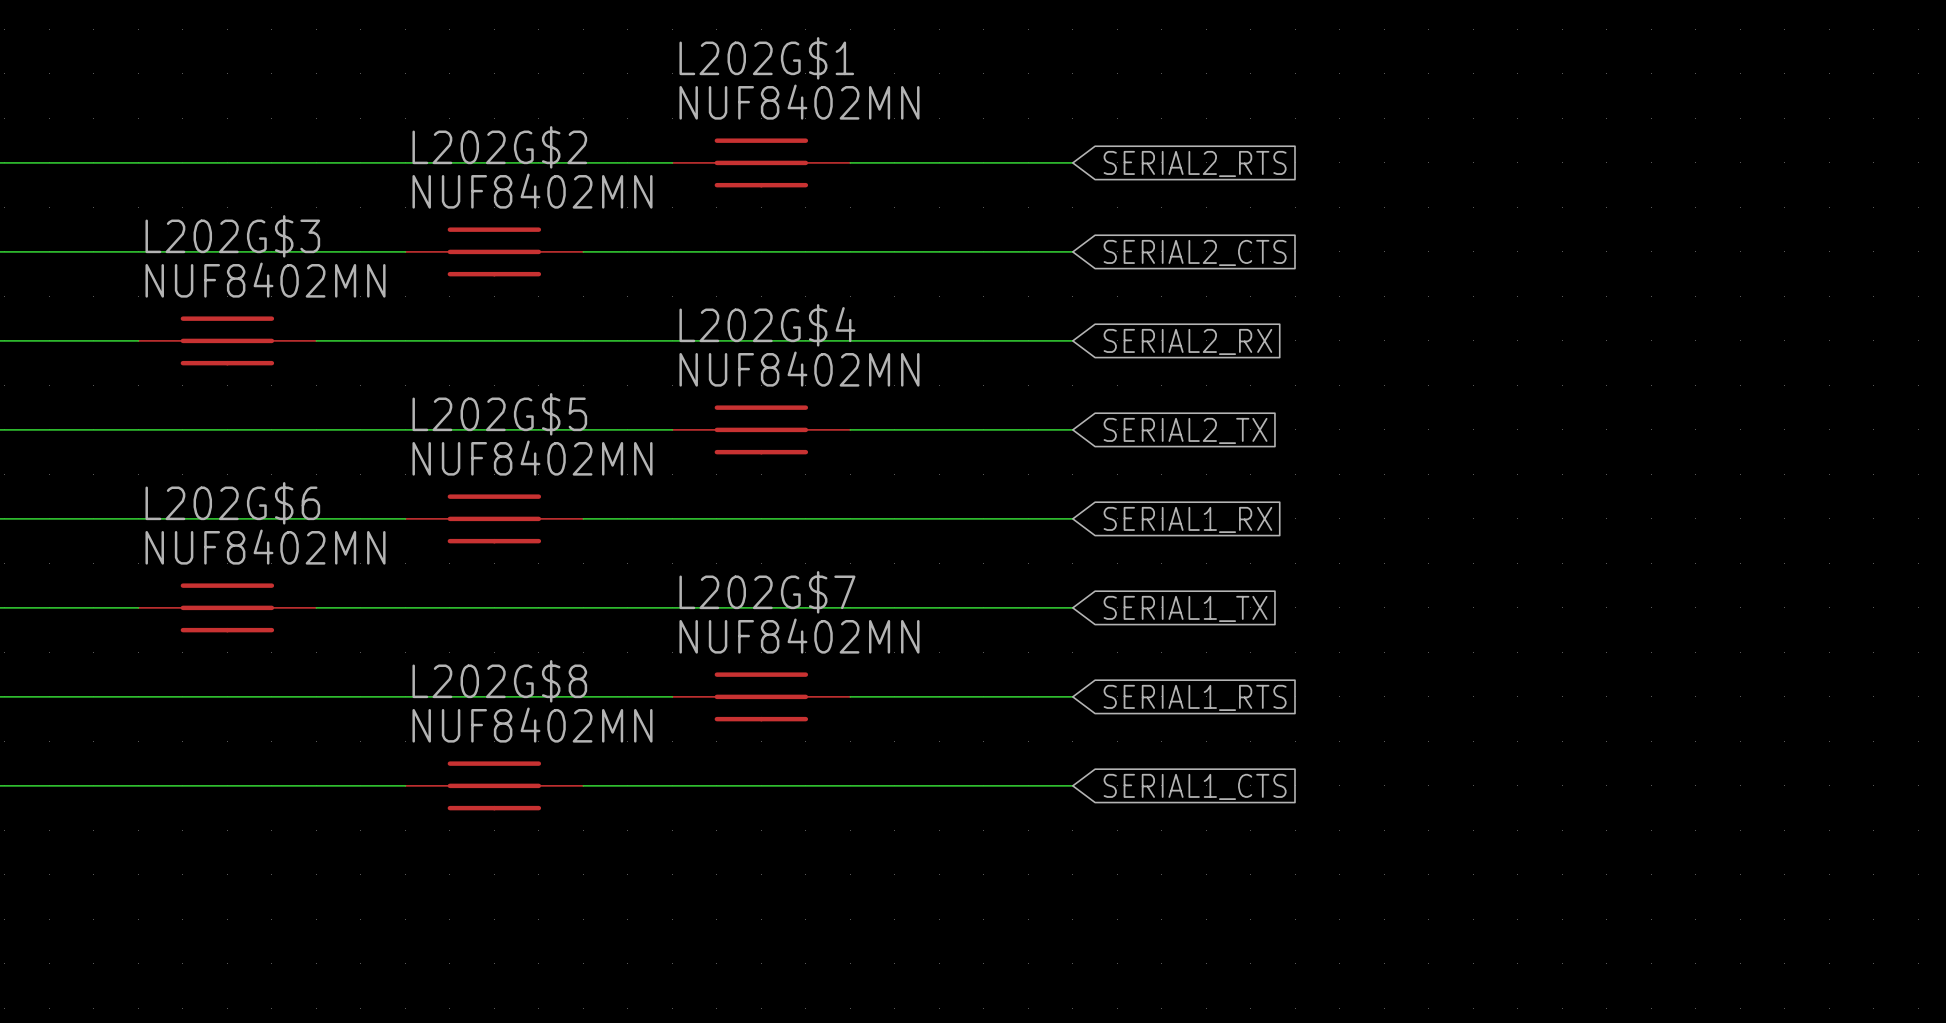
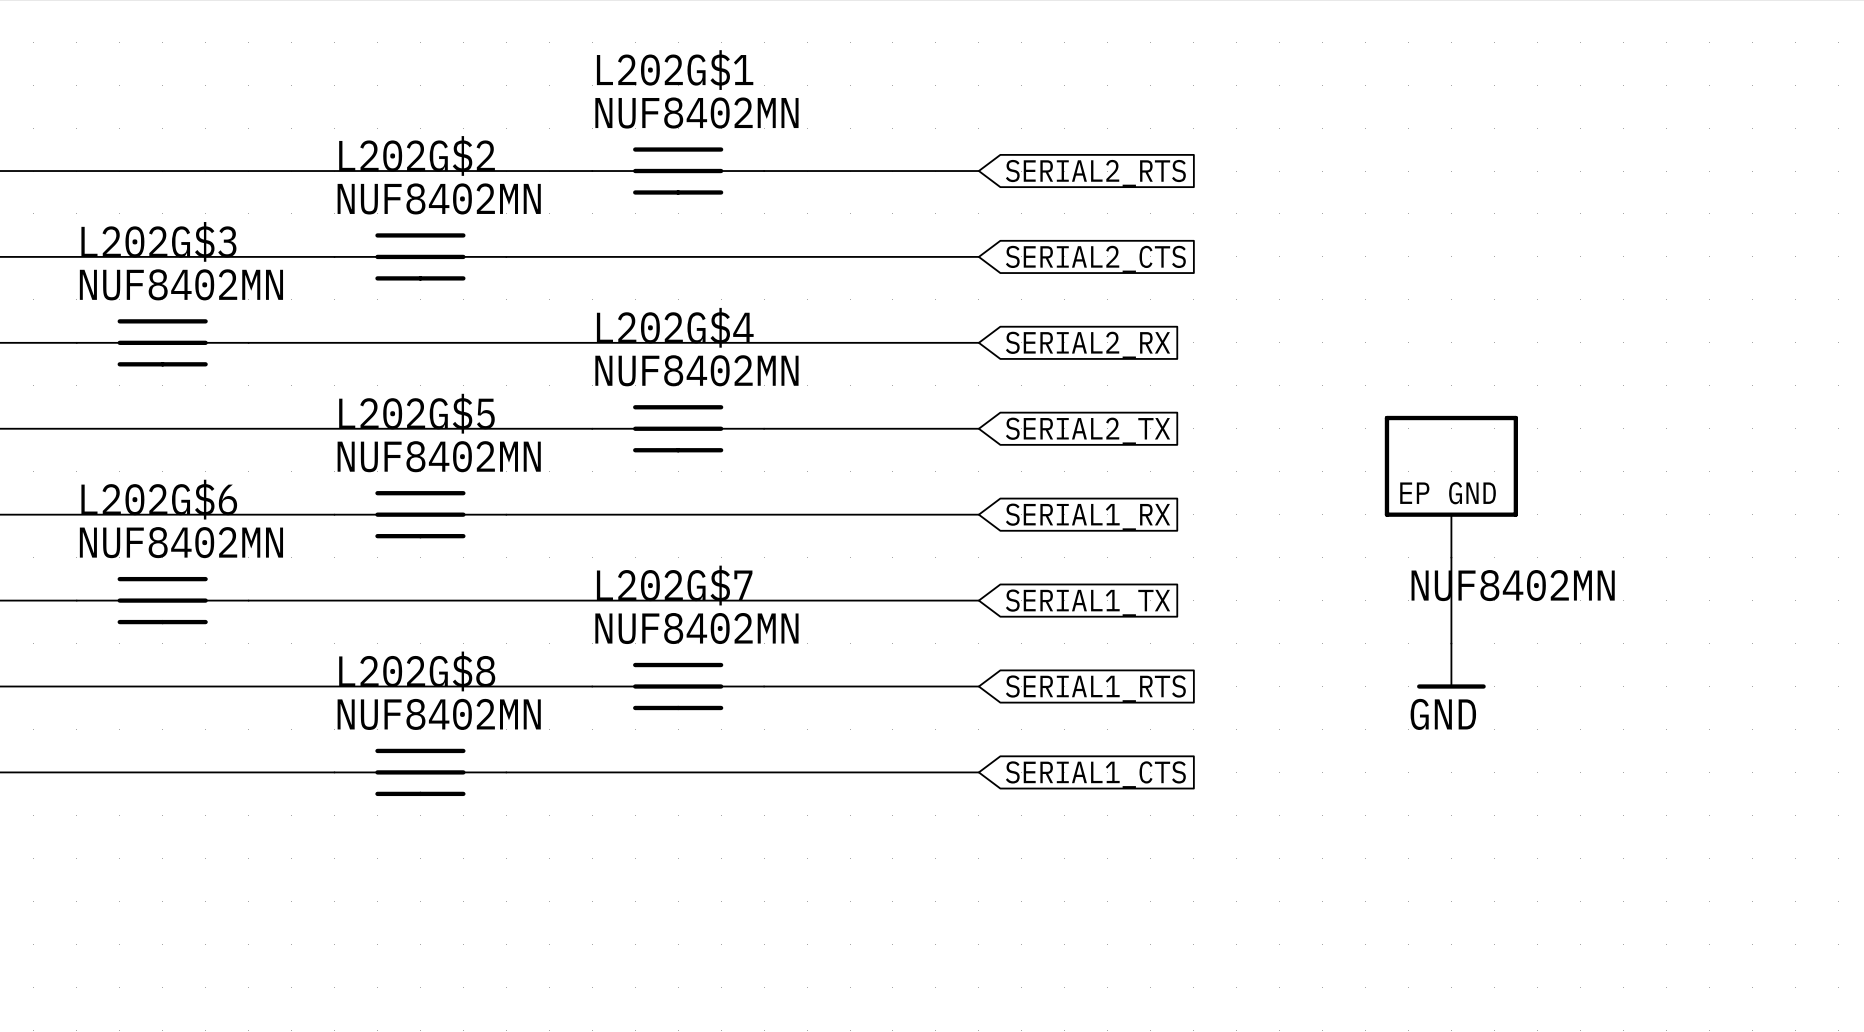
part: none -> NUF8402MN (1451, 486)
wire: none -> (1451, 557) (1451, 643)
power symbol: none -> GND (1451, 666)

